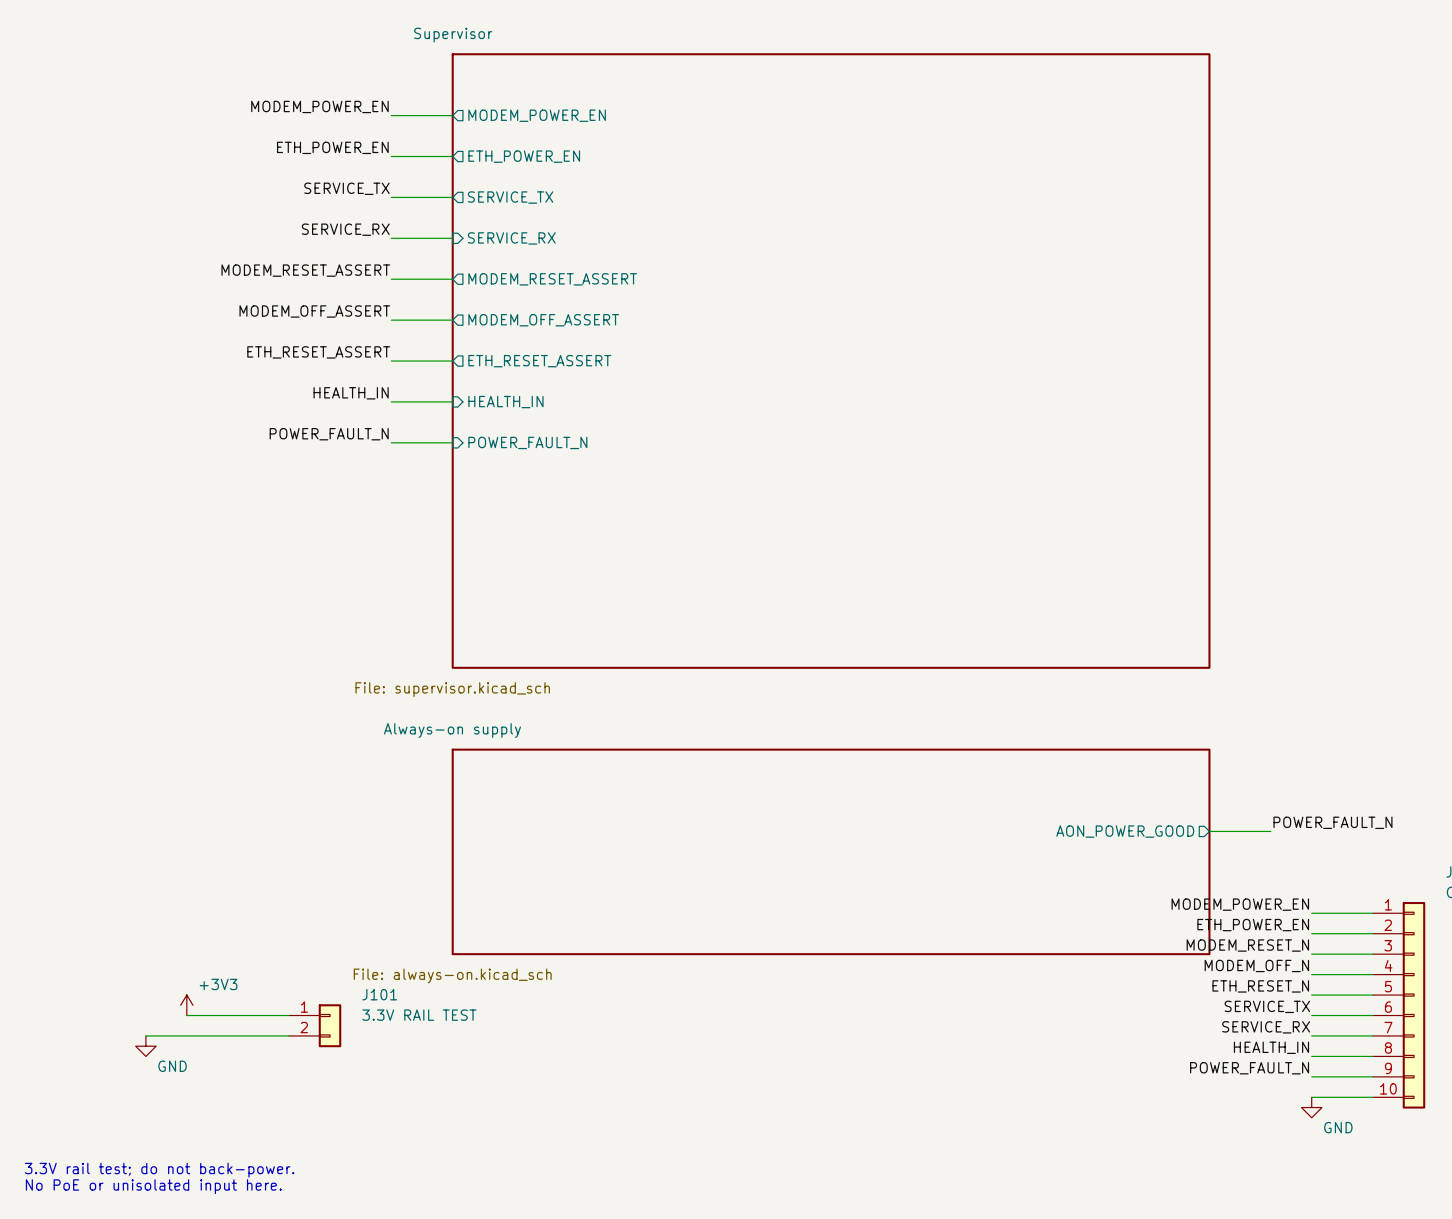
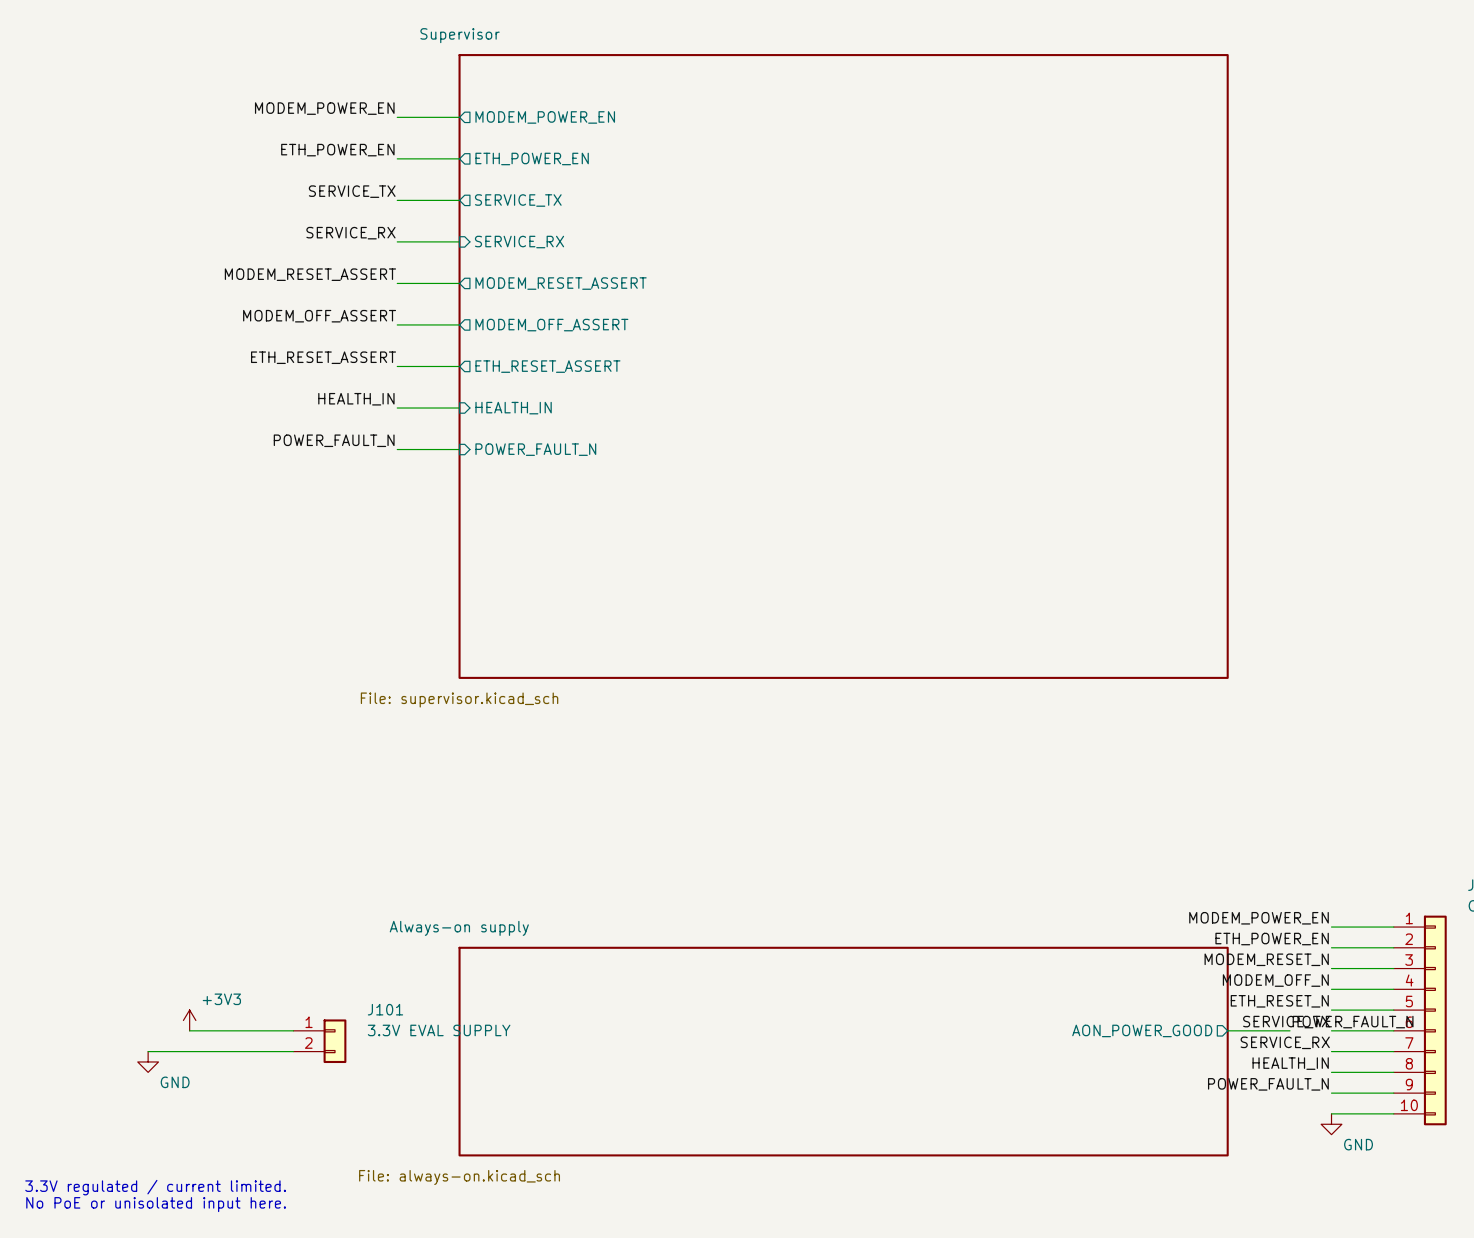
label position: POWER_FAULT_N (1332, 822) -> POWER_FAULT_N (1353, 1022)
sheet pin position: AON_POWER_GOOD (1125, 831) -> AON_POWER_GOOD (1142, 1030)
wire: (1209, 831) (1270, 831) -> (1227, 1030) (1289, 1030)
sheet Always-on supply position: (831, 851) -> (843, 1051)
J101 value: 3.3V RAIL TEST (419, 1015) -> 3.3V EVAL SUPPLY (439, 1030)
text: 3.3V rail test; do not back-power. (159, 1170) -> 3.3V regulated / current limited. (155, 1187)

